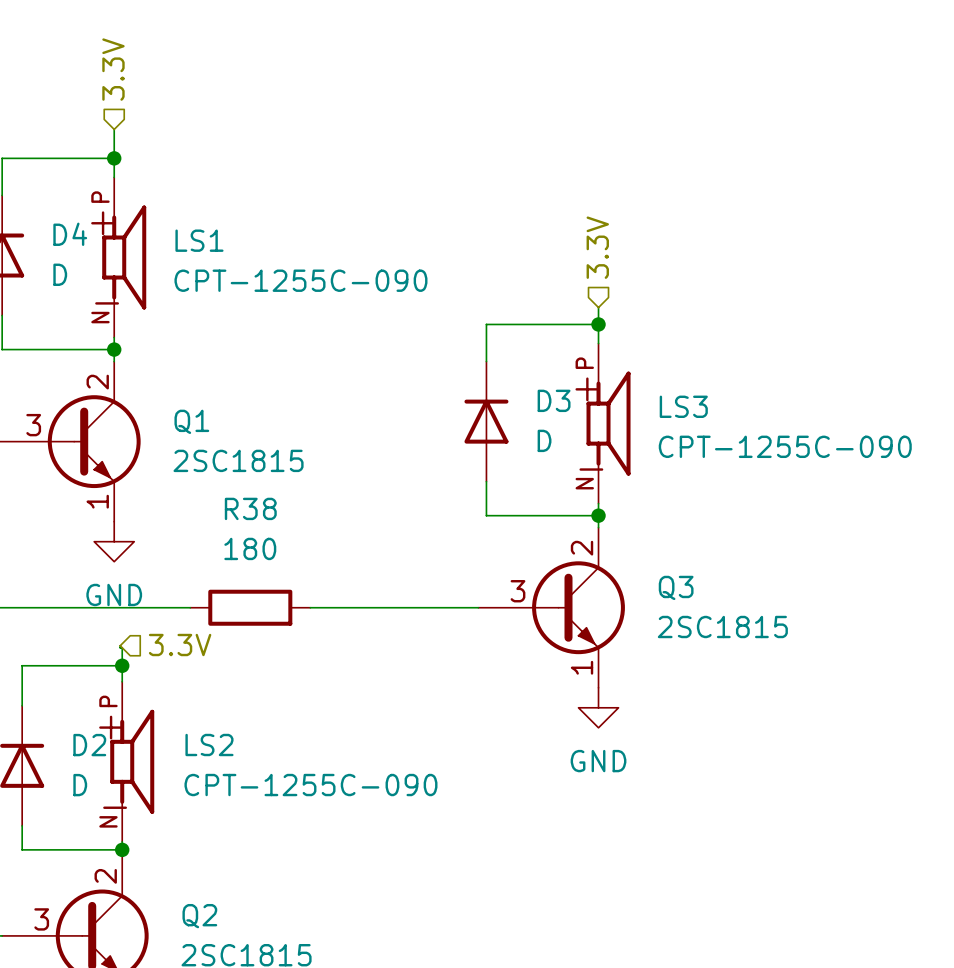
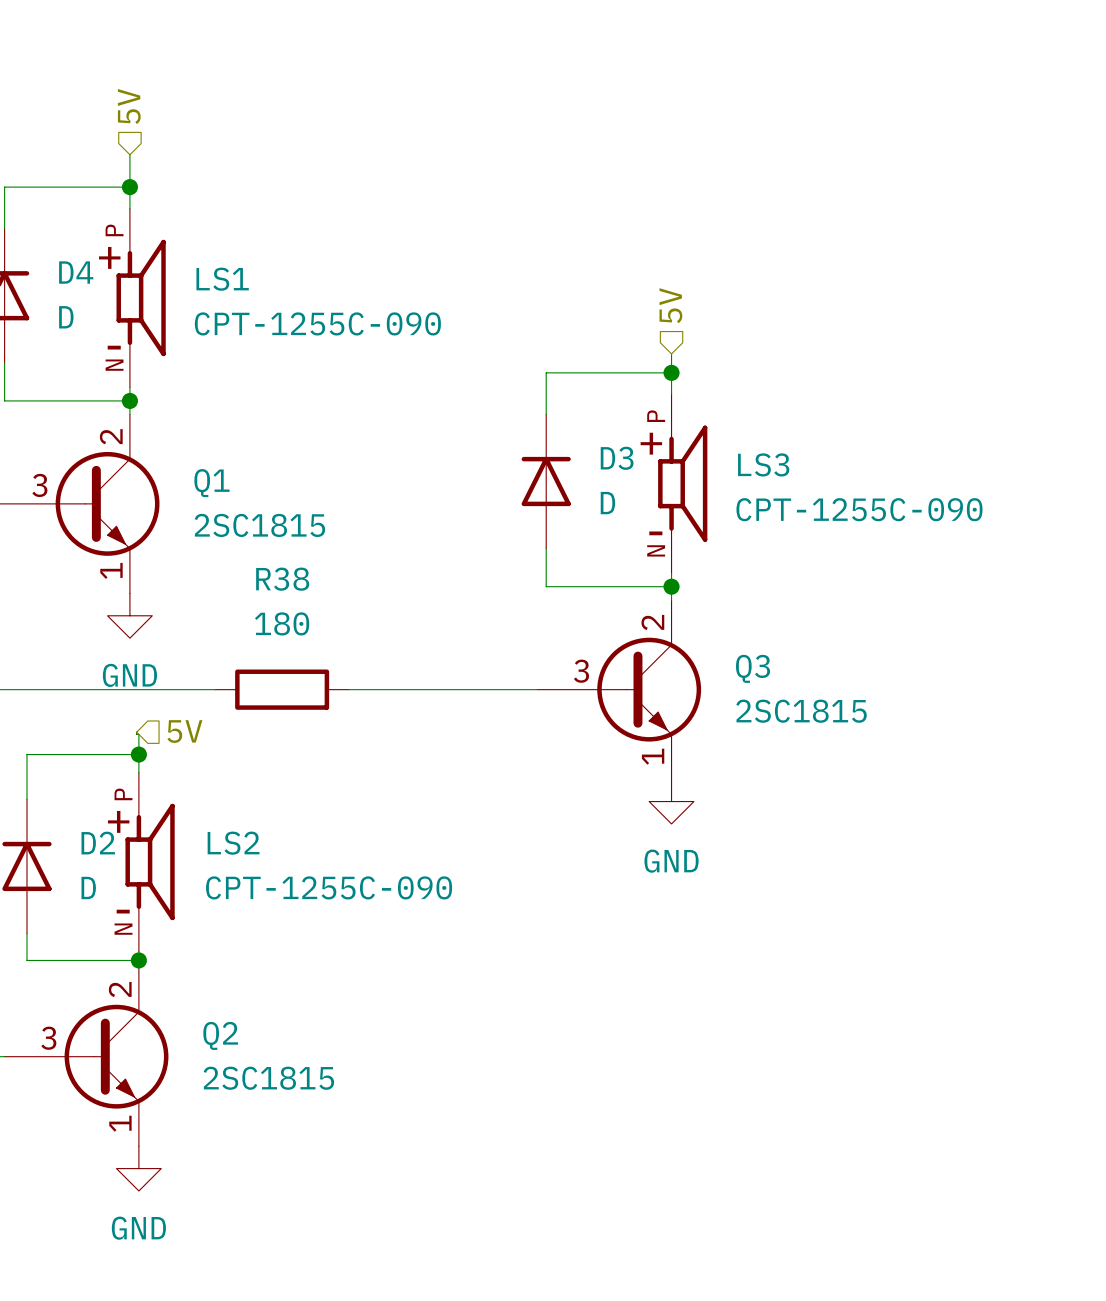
hierarchical label: 3.3V (113, 69) -> 5V (129, 106)
hierarchical label: 3.3V (597, 247) -> 5V (670, 305)
hierarchical label: 3.3V (180, 645) -> 5V (184, 731)

